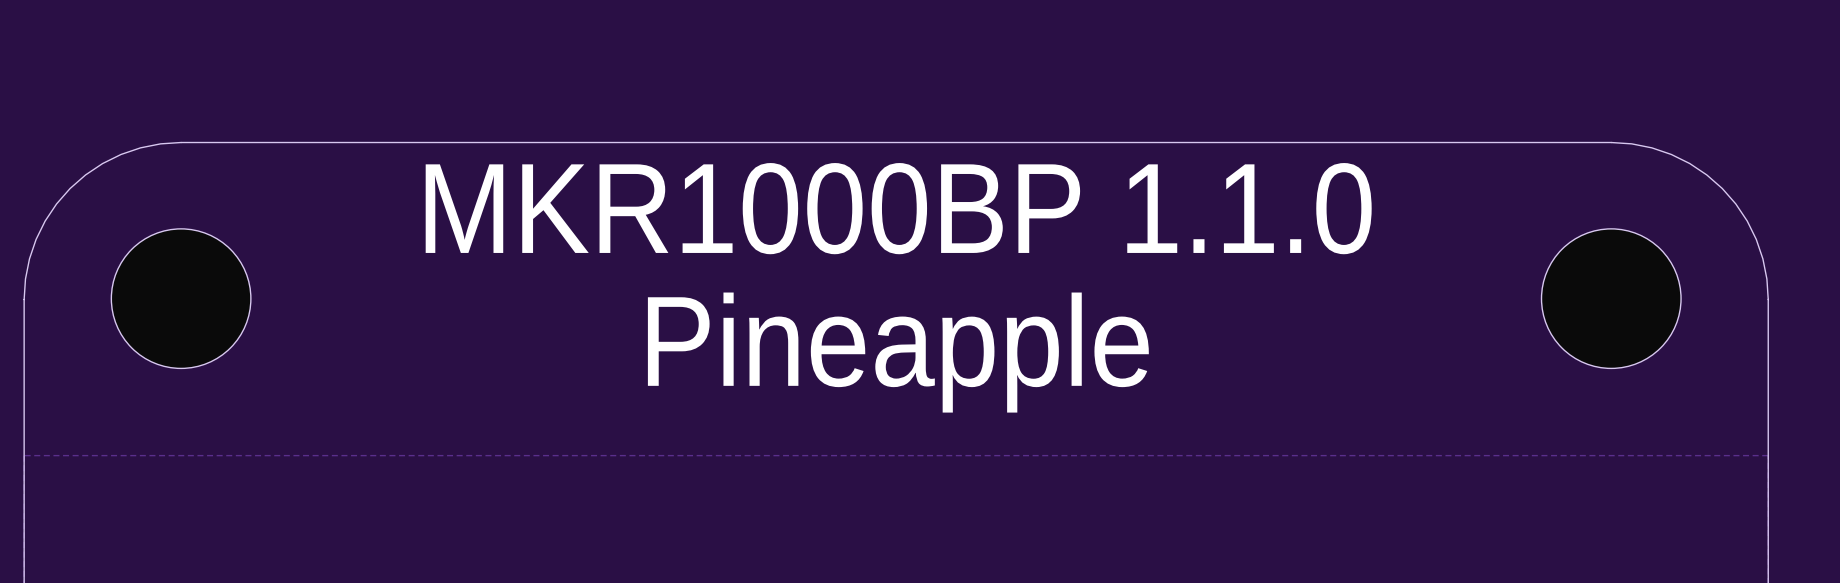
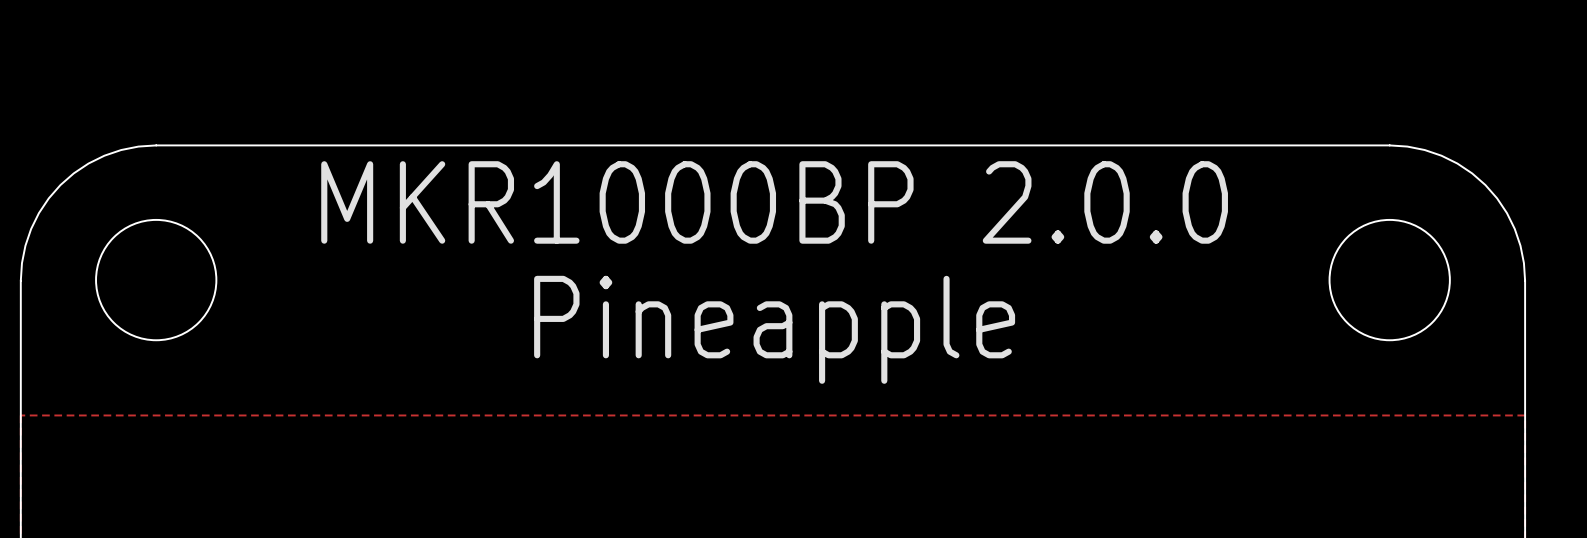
text: MKR1000BP 1.1.0 (898, 208) -> MKR1000BP 2.0.0 (774, 202)

